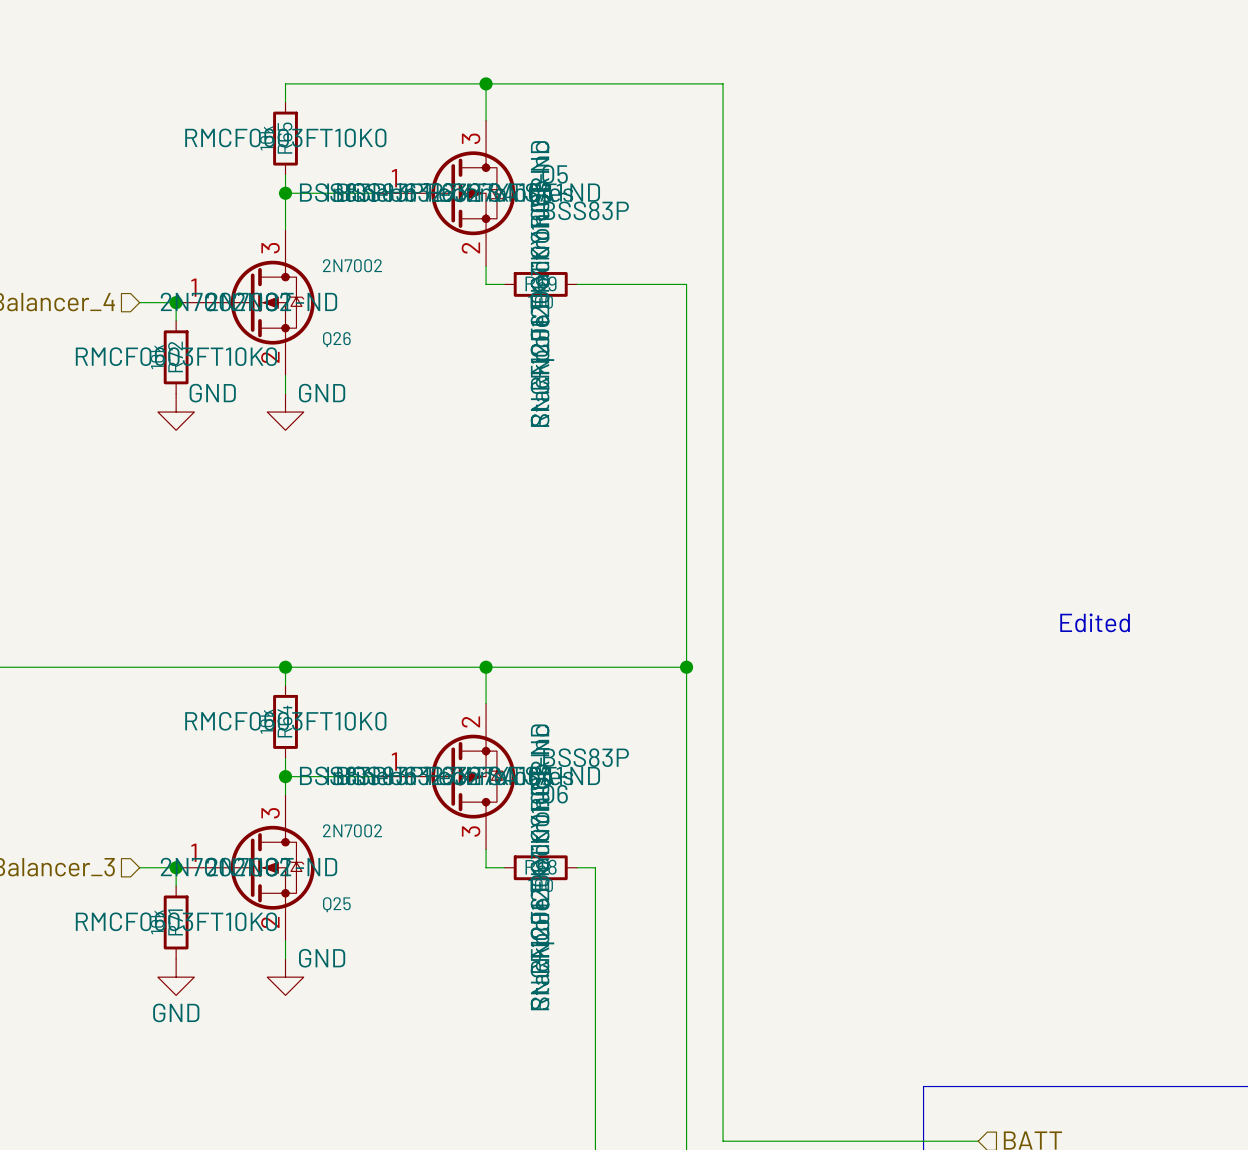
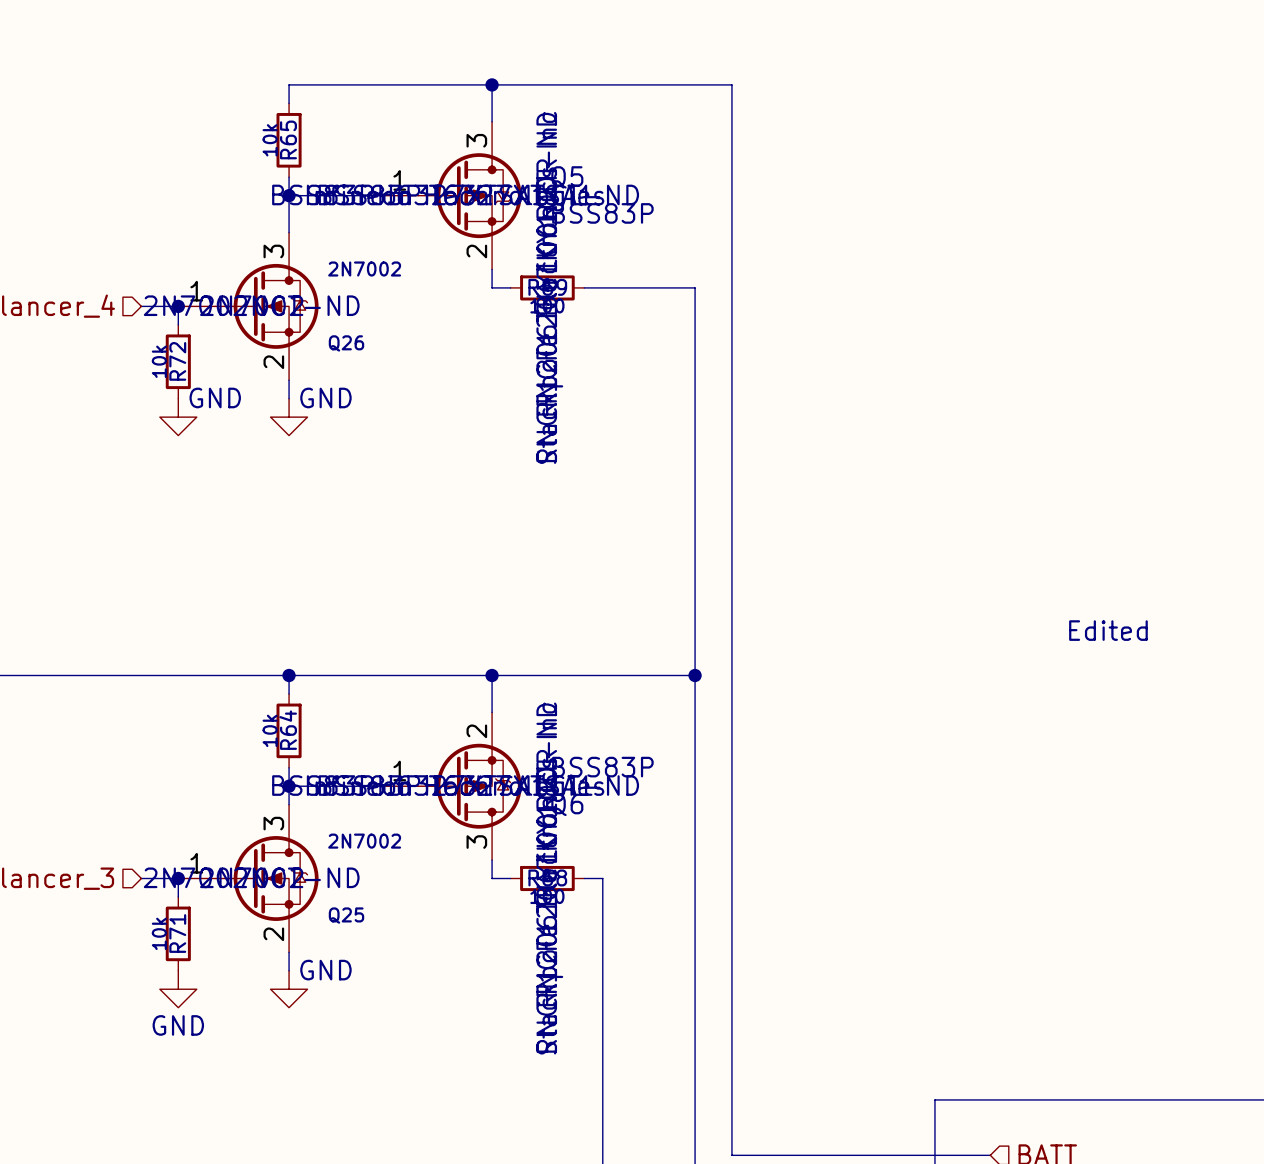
R65 text: RMCF0603FT10K0 (285, 137) -> none
R72 text: RMCF0603FT10K0 (176, 356) -> none
R64 text: RMCF0603FT10K0 (285, 721) -> none
R71 text: RMCF0603FT10K0 (176, 921) -> none

